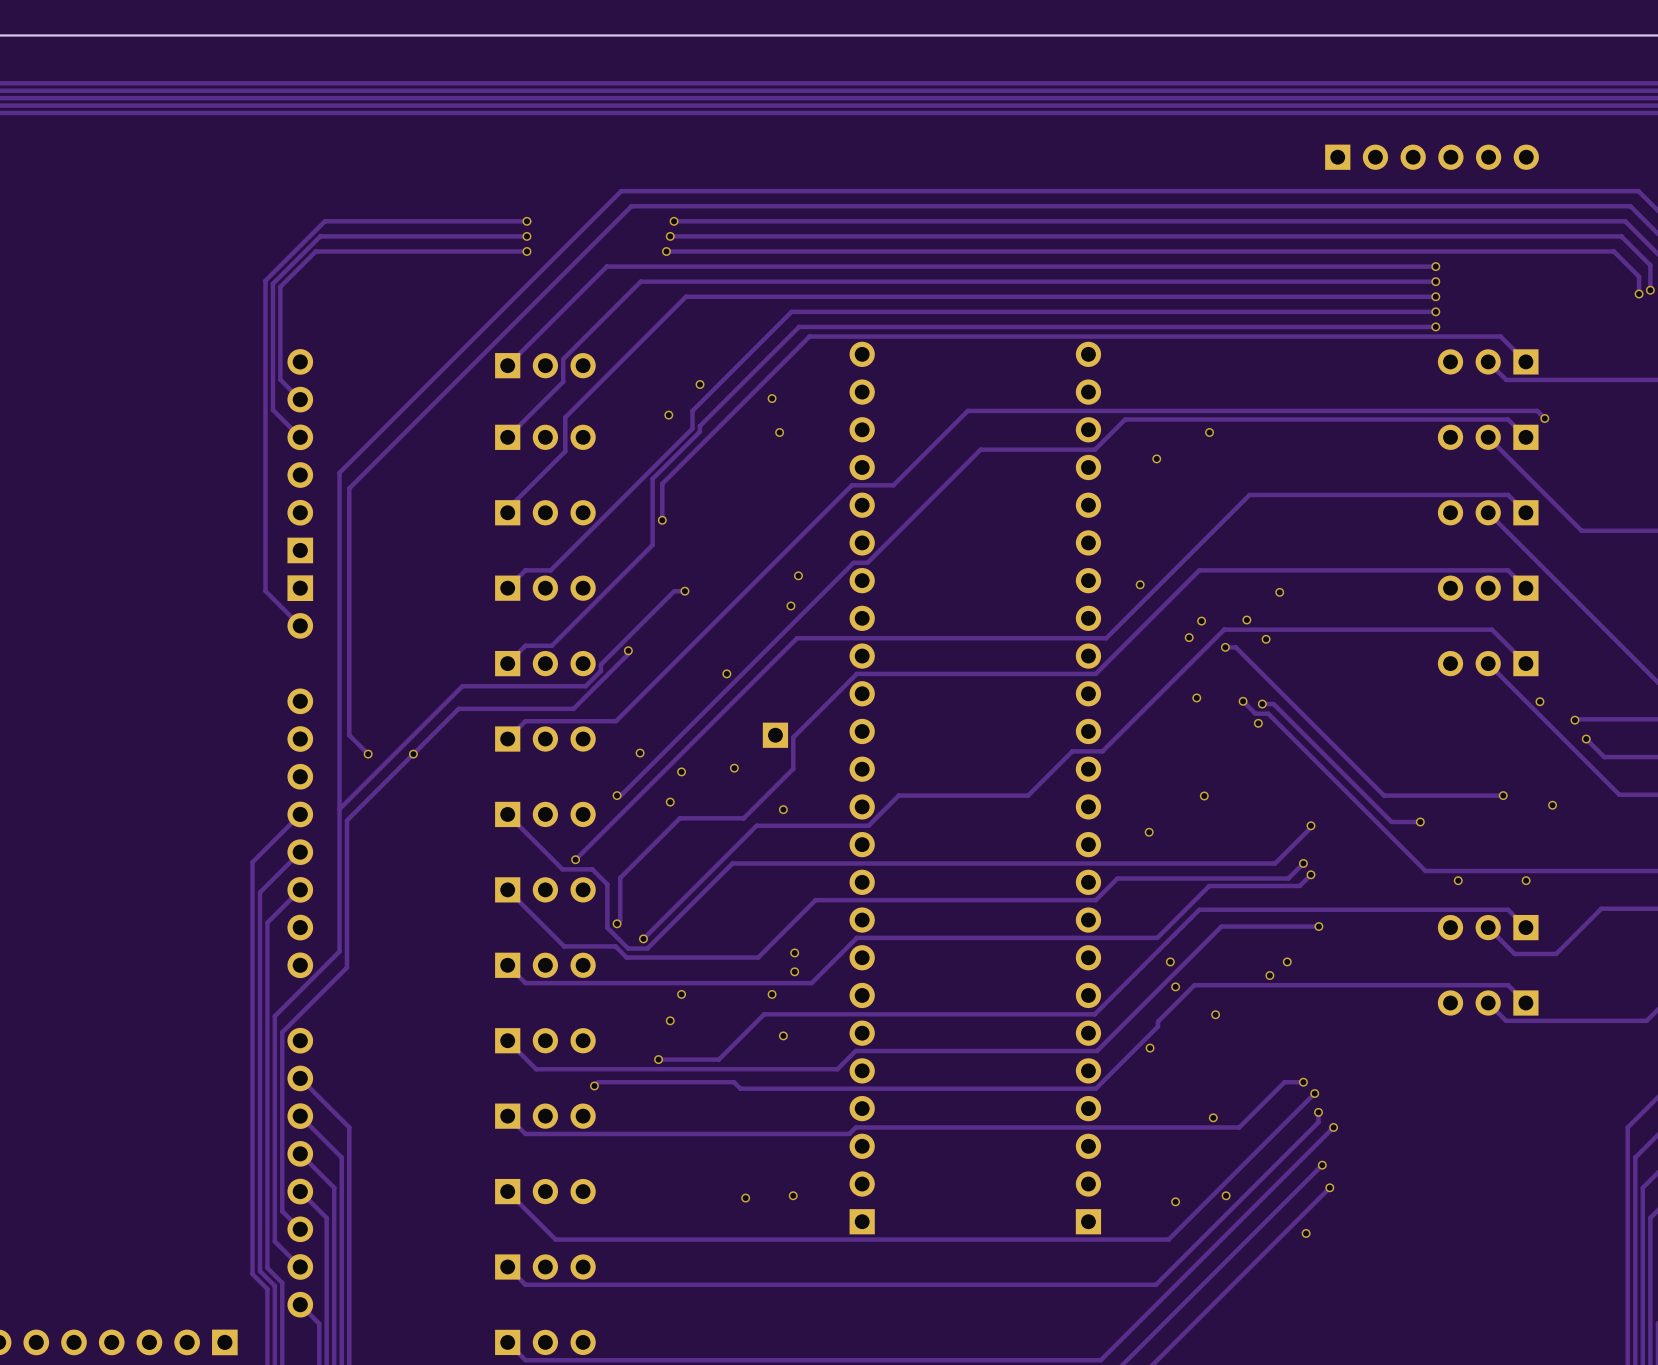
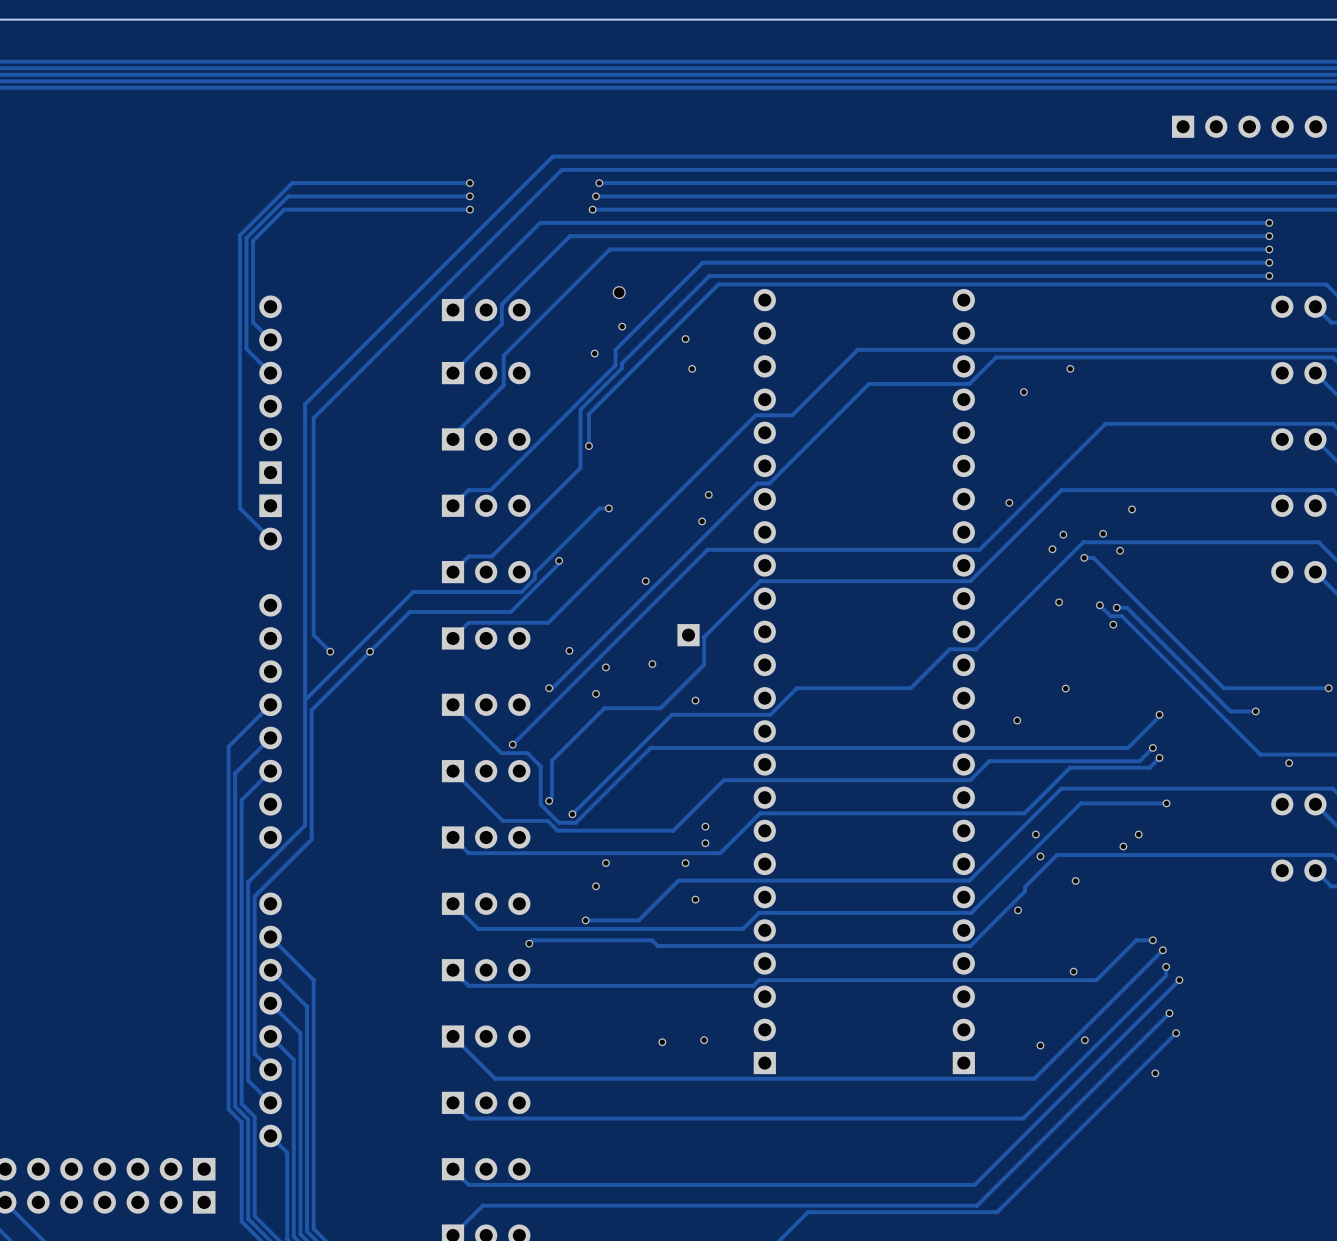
via: none -> (619, 292)

